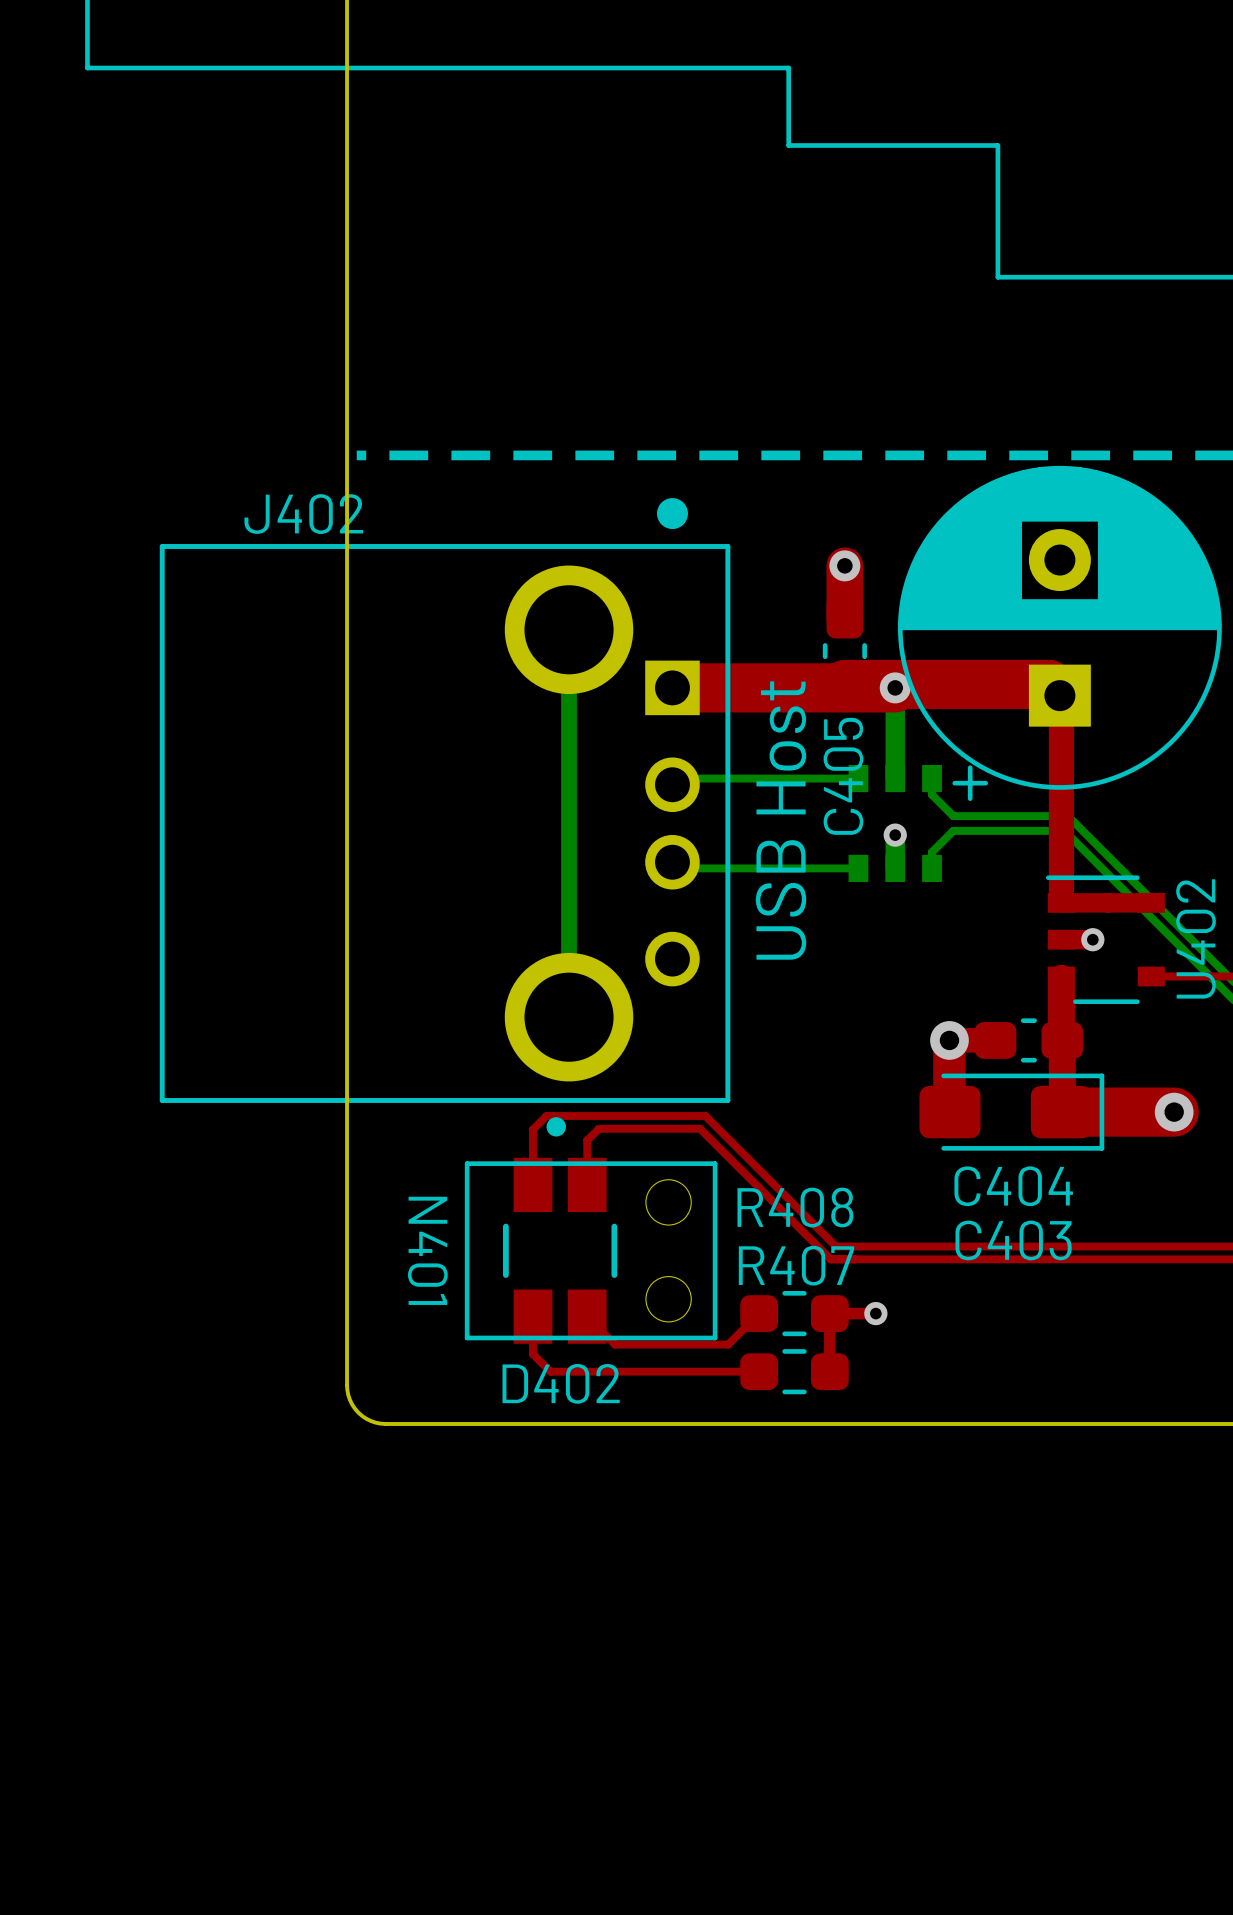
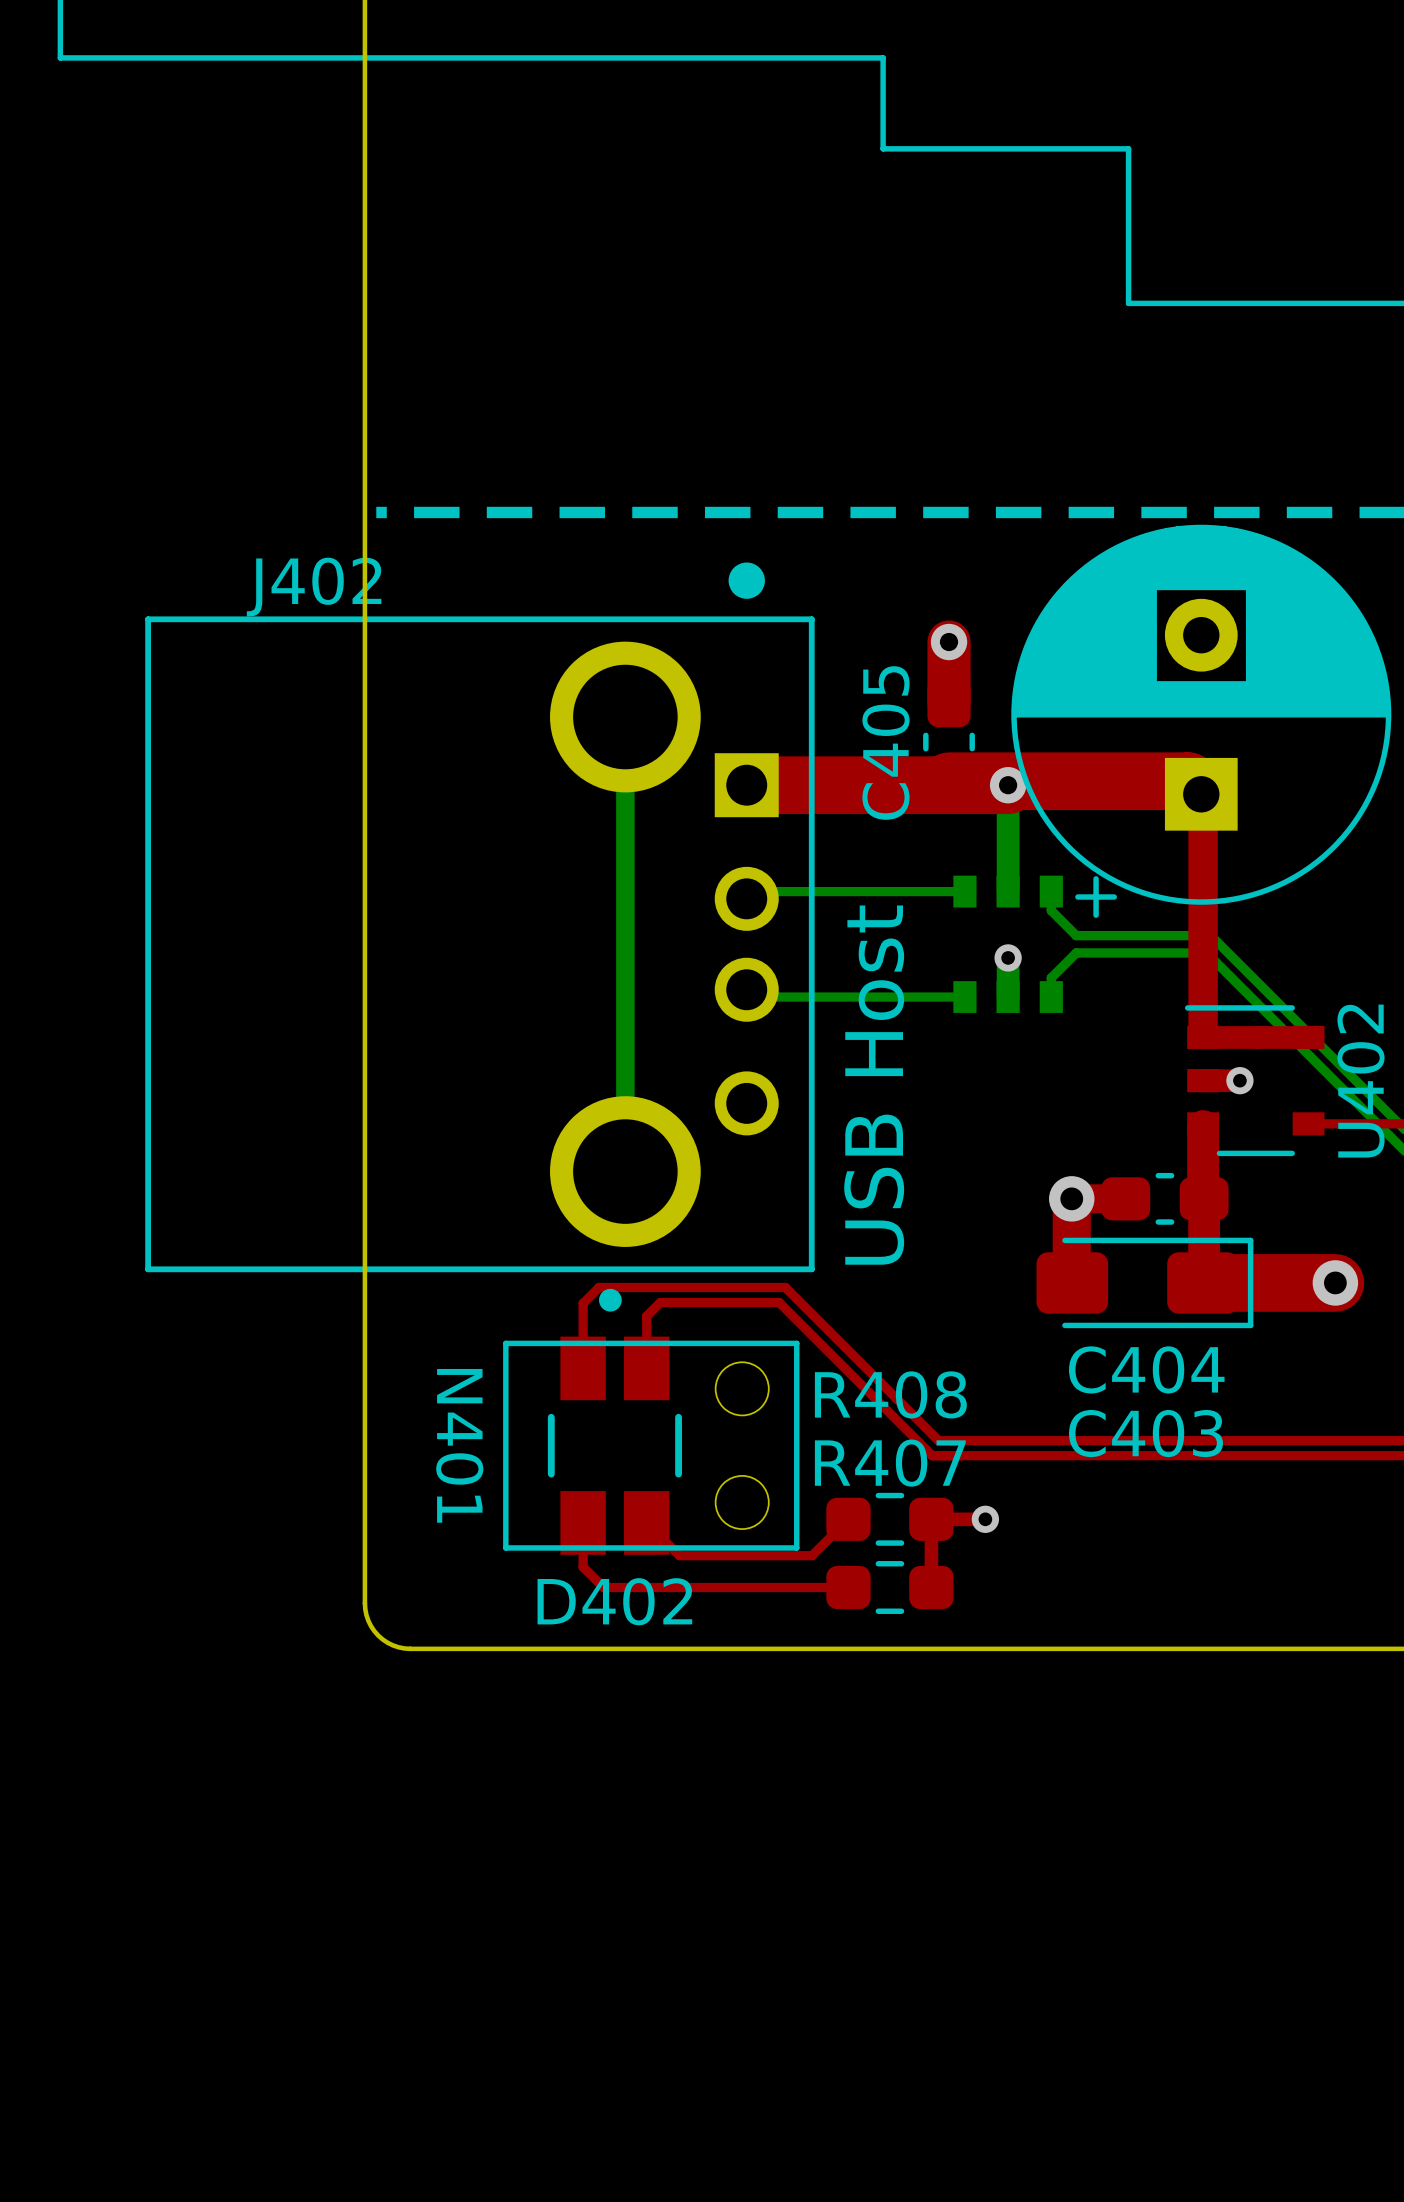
C405 name position: C405 (843, 776) -> C405 (885, 743)
text position: USB Host (781, 820) -> USB Host (874, 1085)

